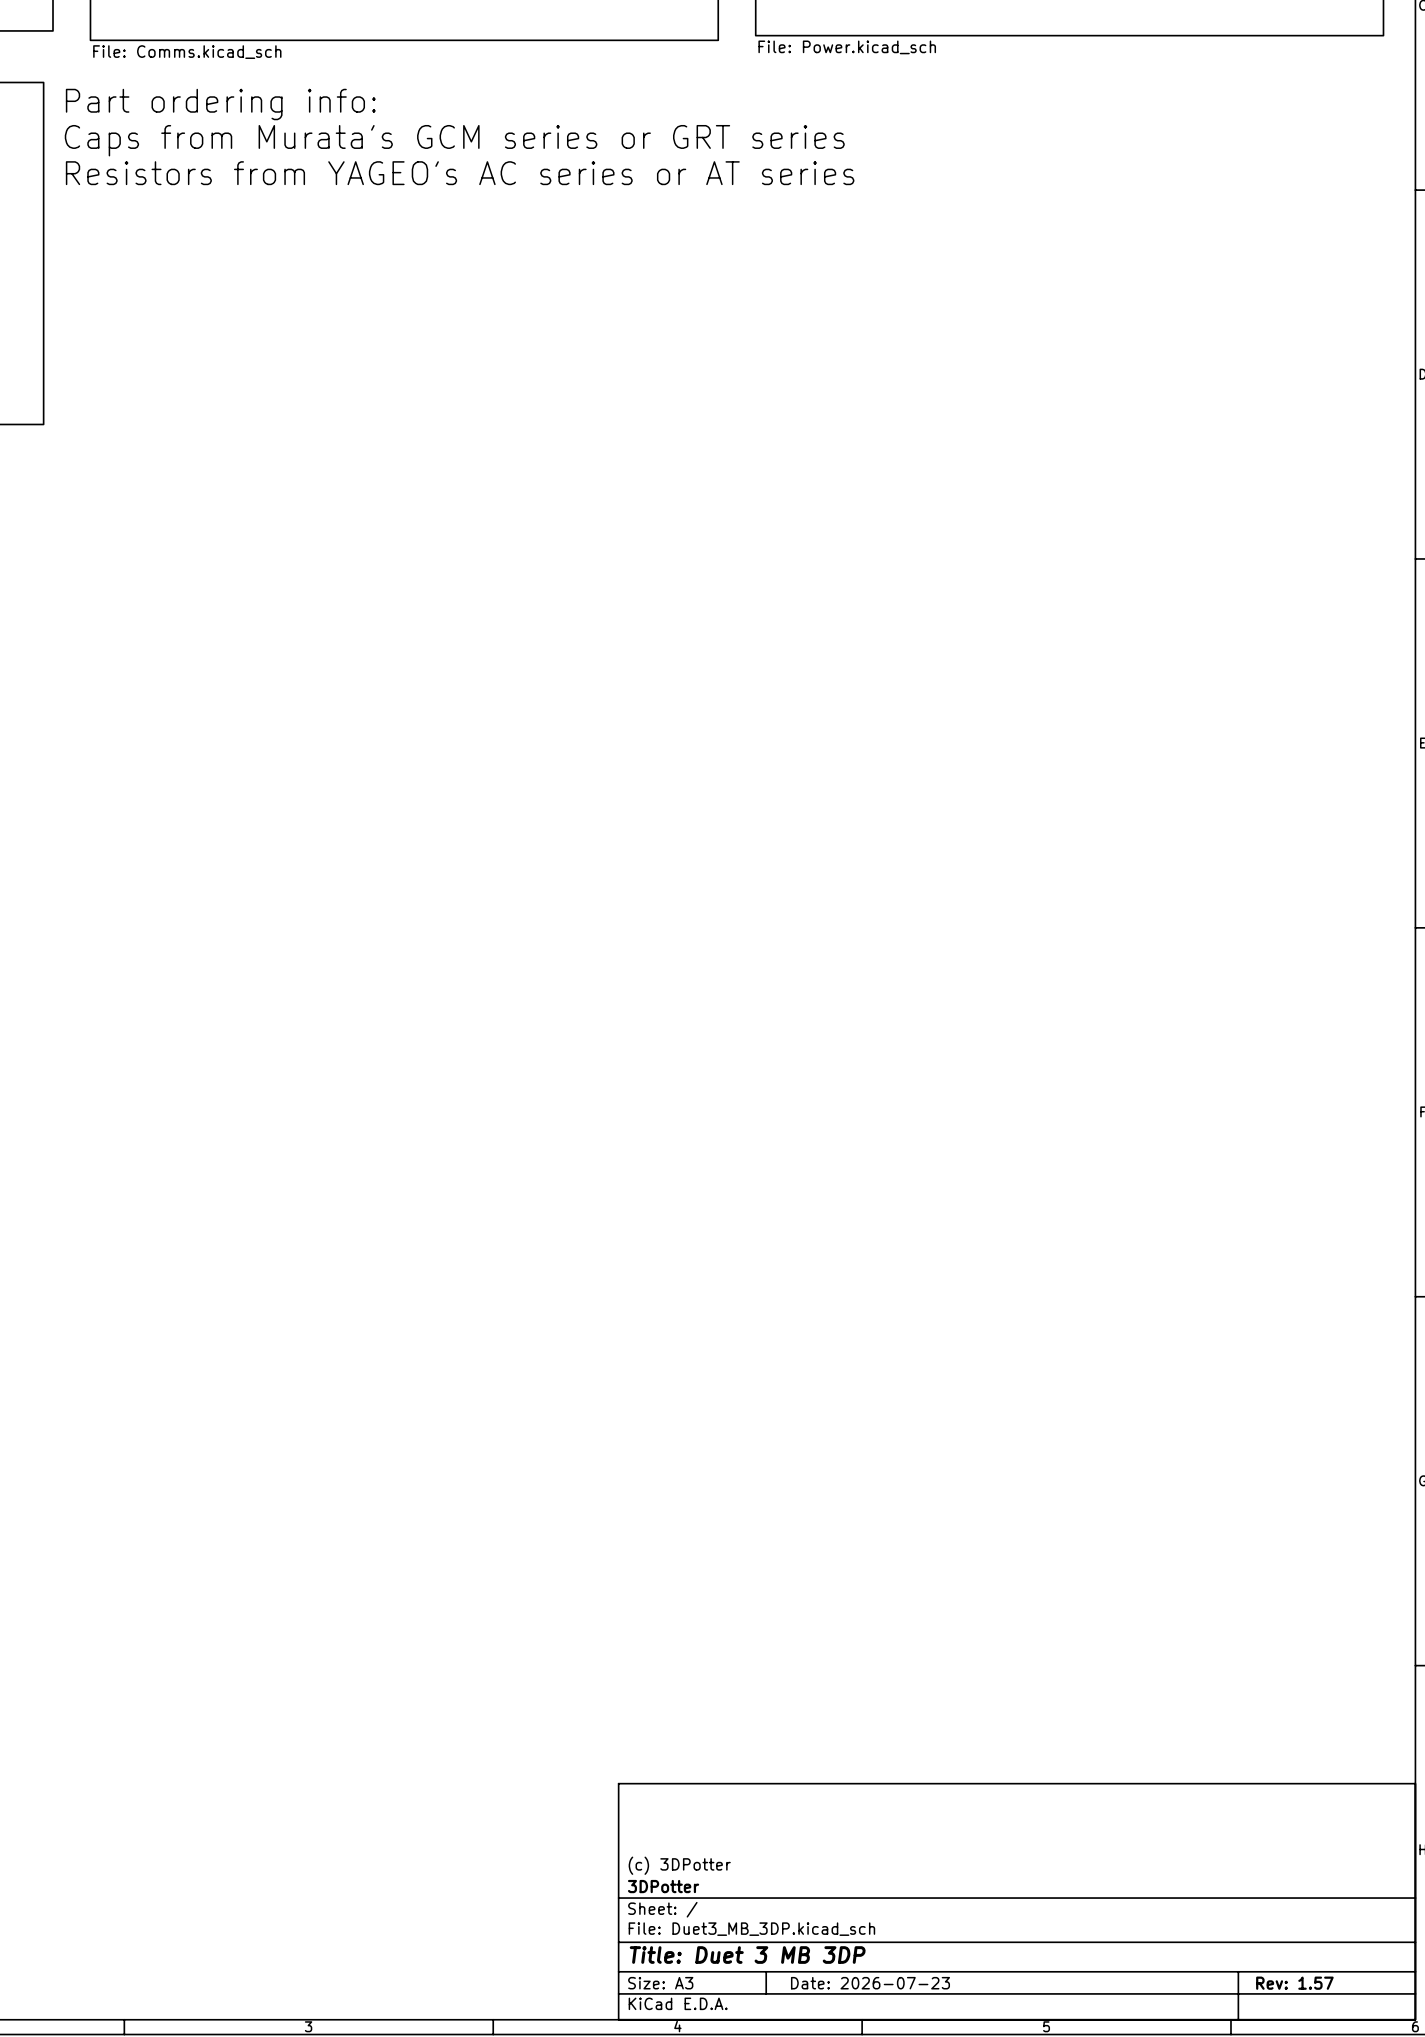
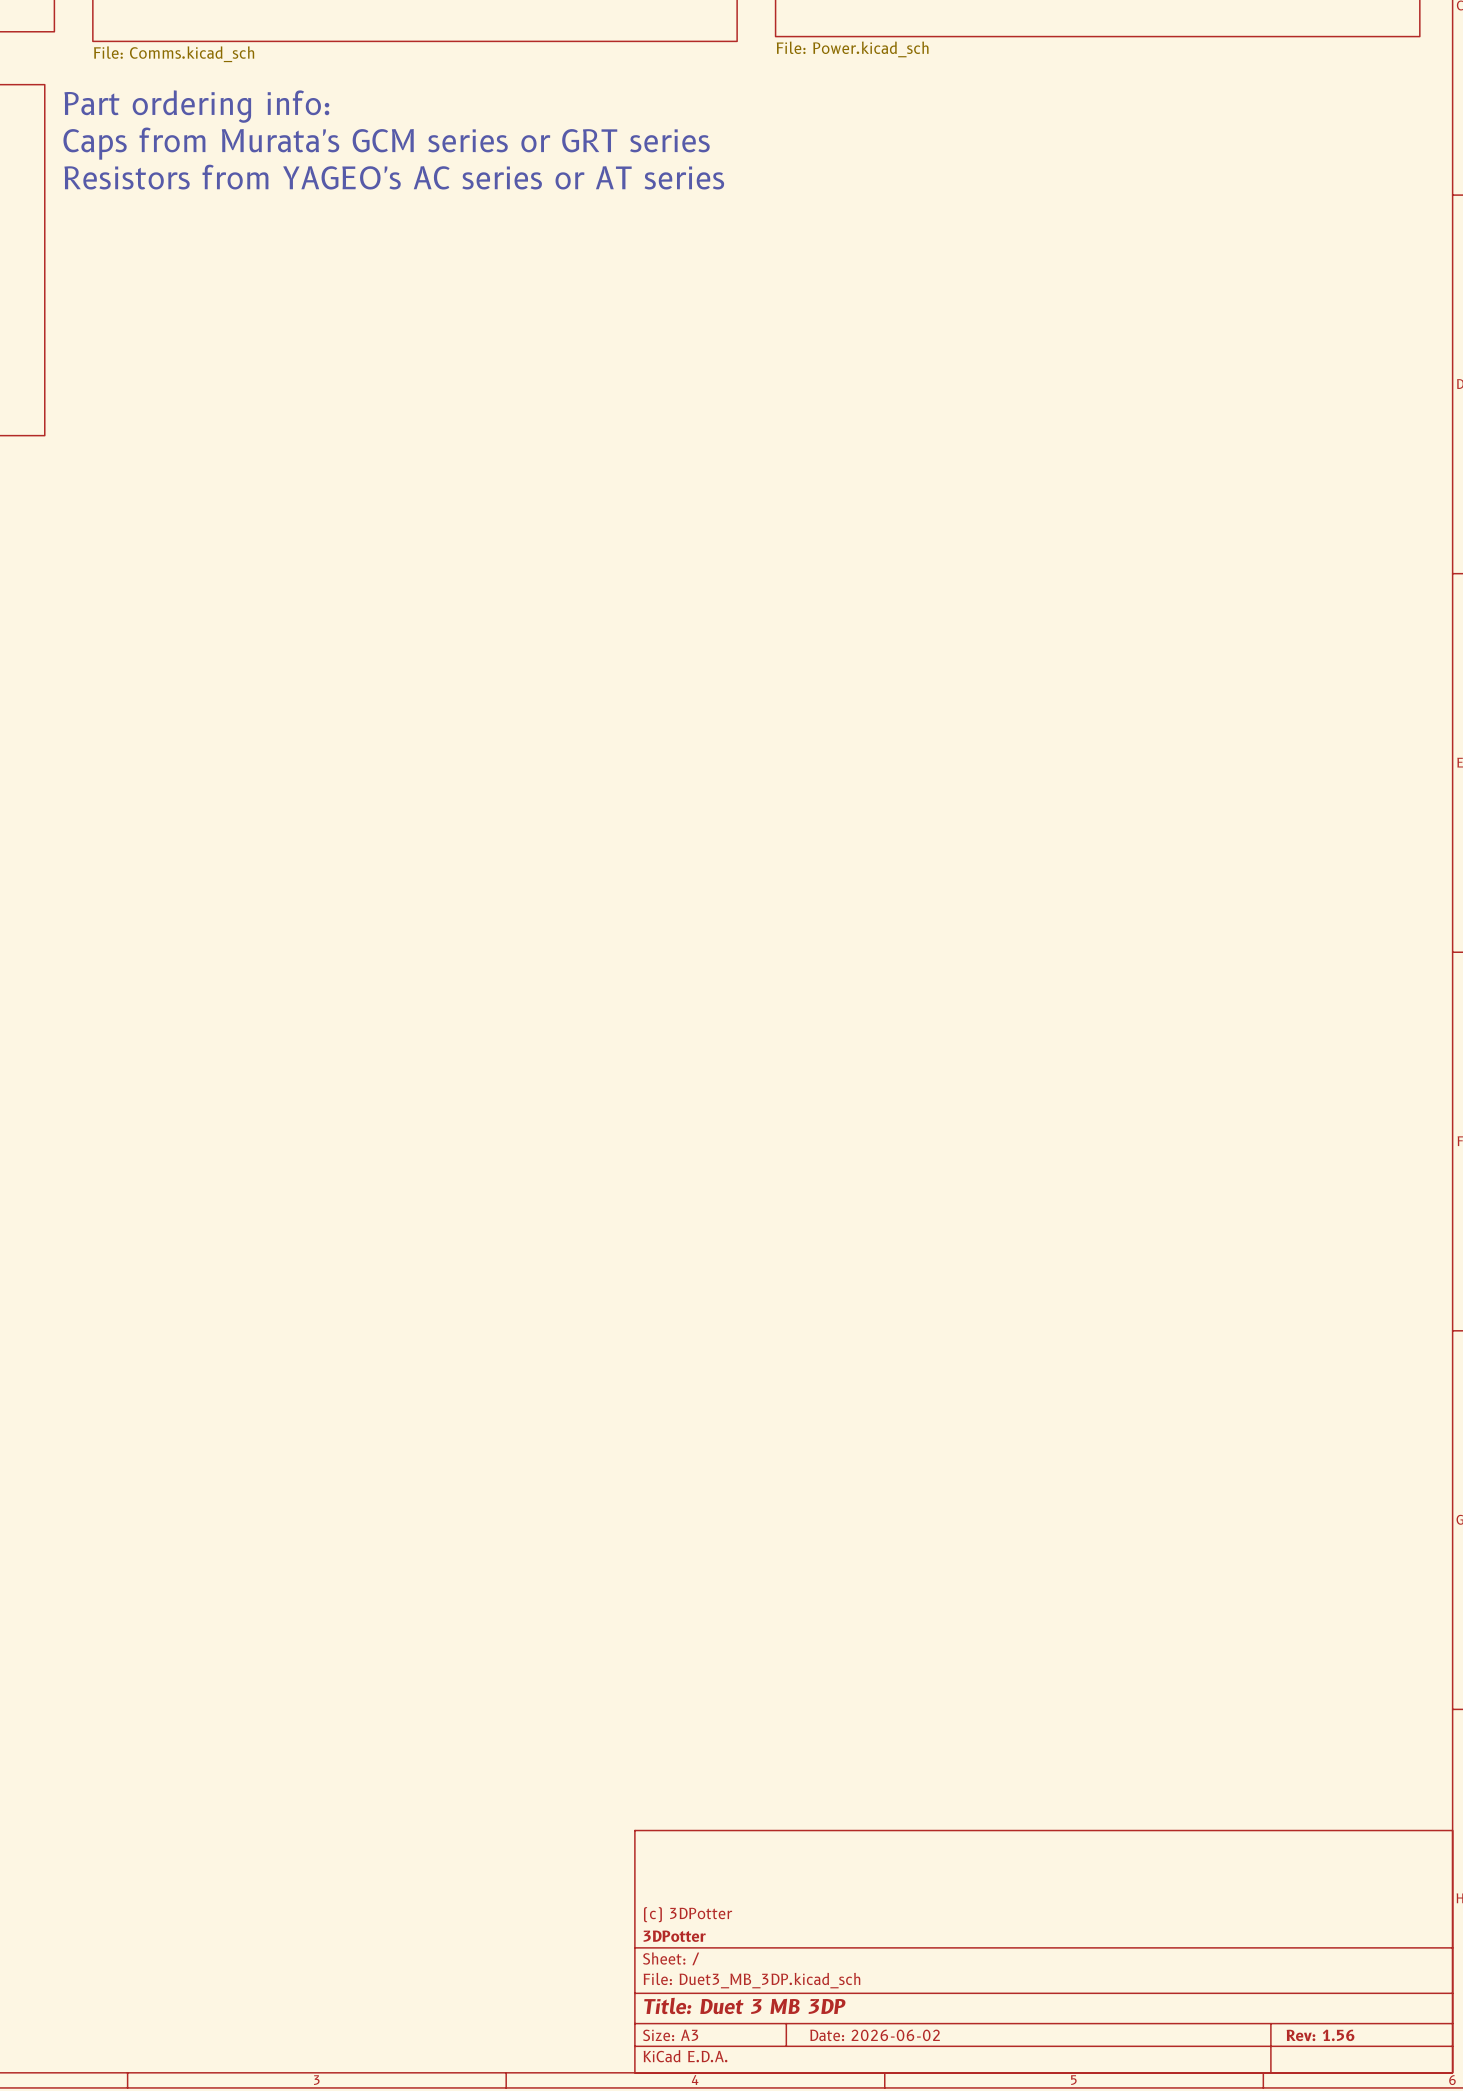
title block: Date: 2026-07-23 (870, 1983) -> Date: 2026-06-02 (875, 2035)
title block: Rev: 1.57 (1294, 1983) -> Rev: 1.56 (1320, 2035)

